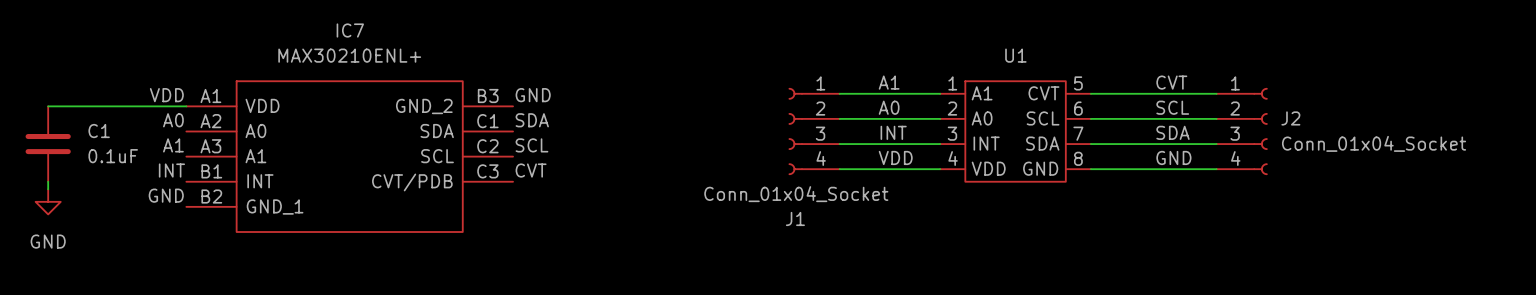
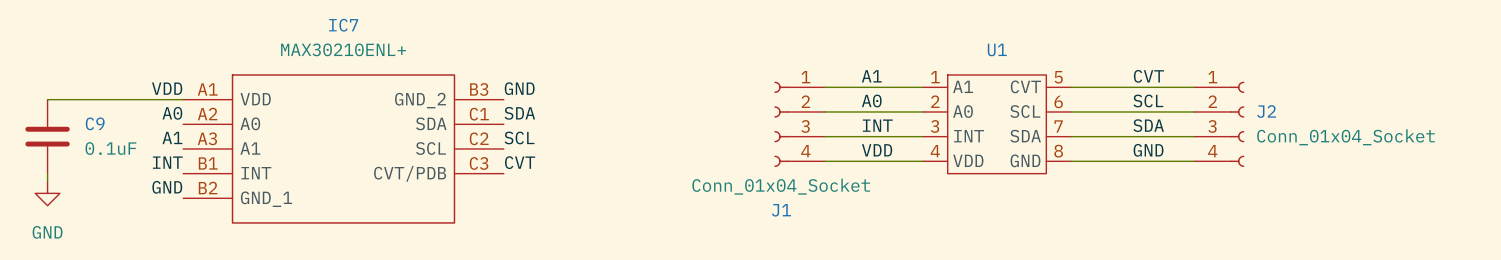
C1 name: C1 (99, 131) -> C9 (95, 123)

